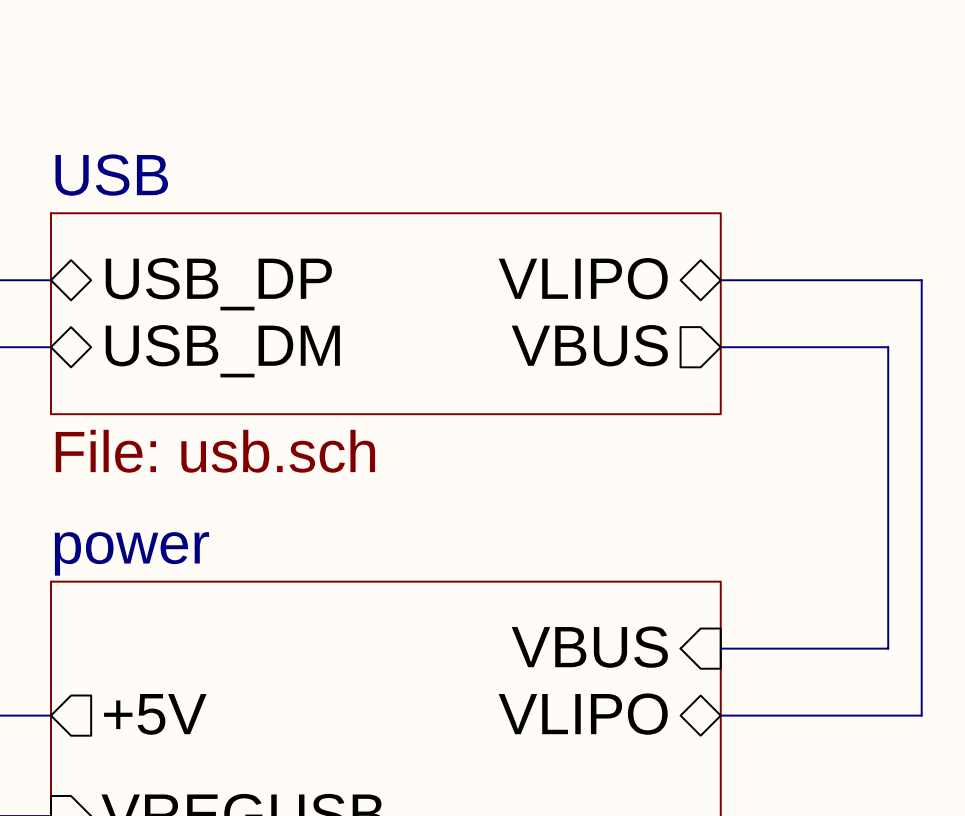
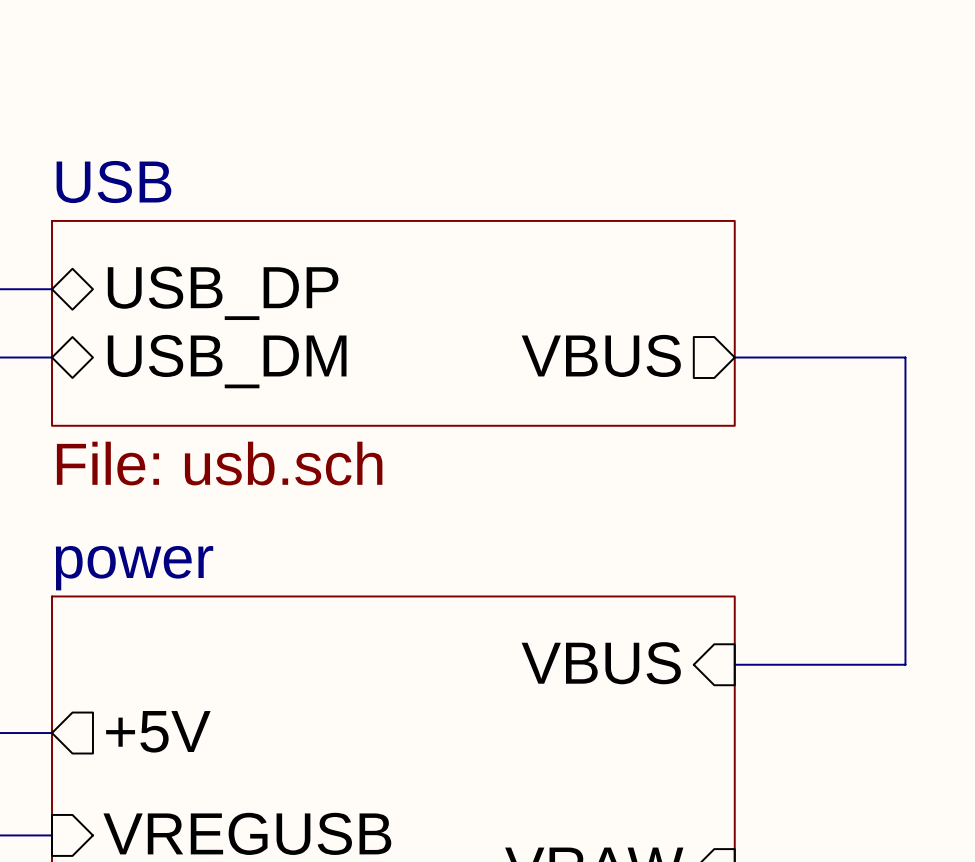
sheet pin: VLIPO (583, 278) -> none
wire: (720, 280) (921, 280) (921, 715) (720, 715) -> none
sheet pin: VLIPO (583, 714) -> none

